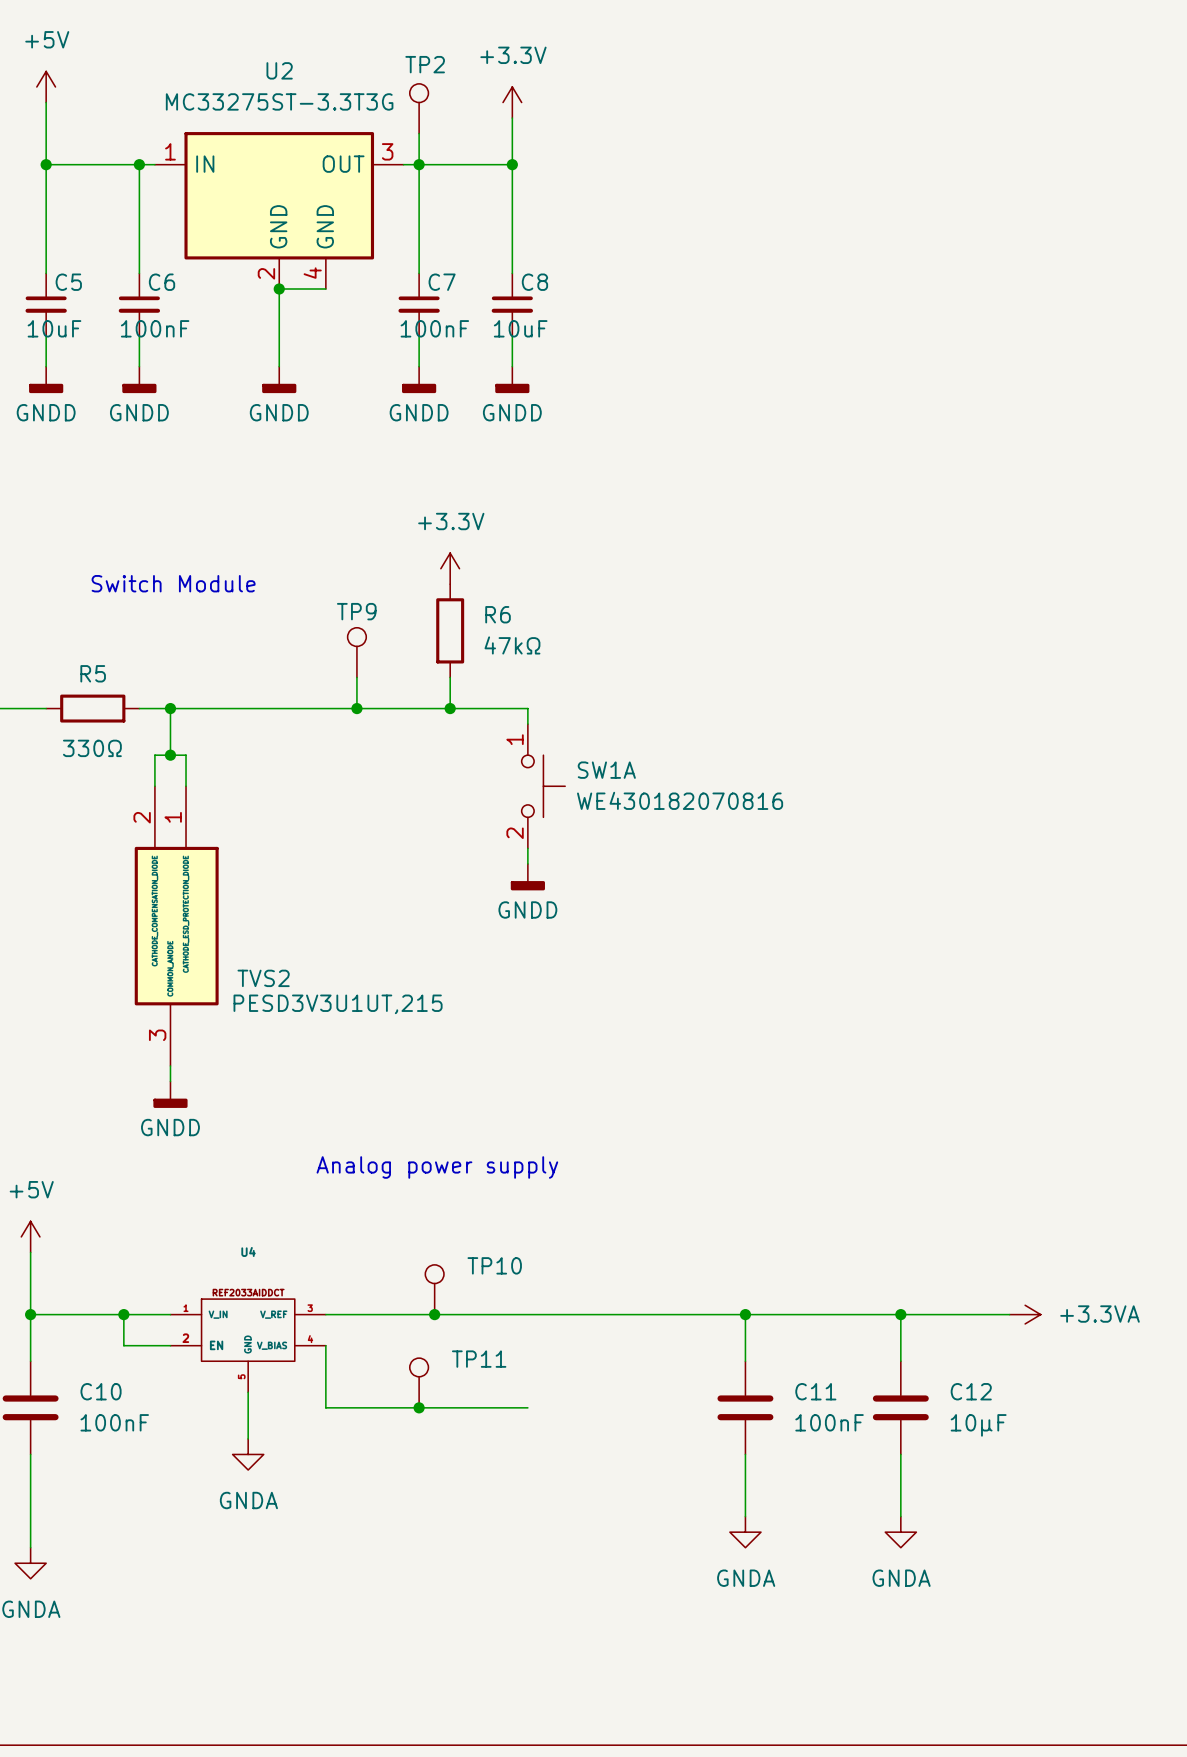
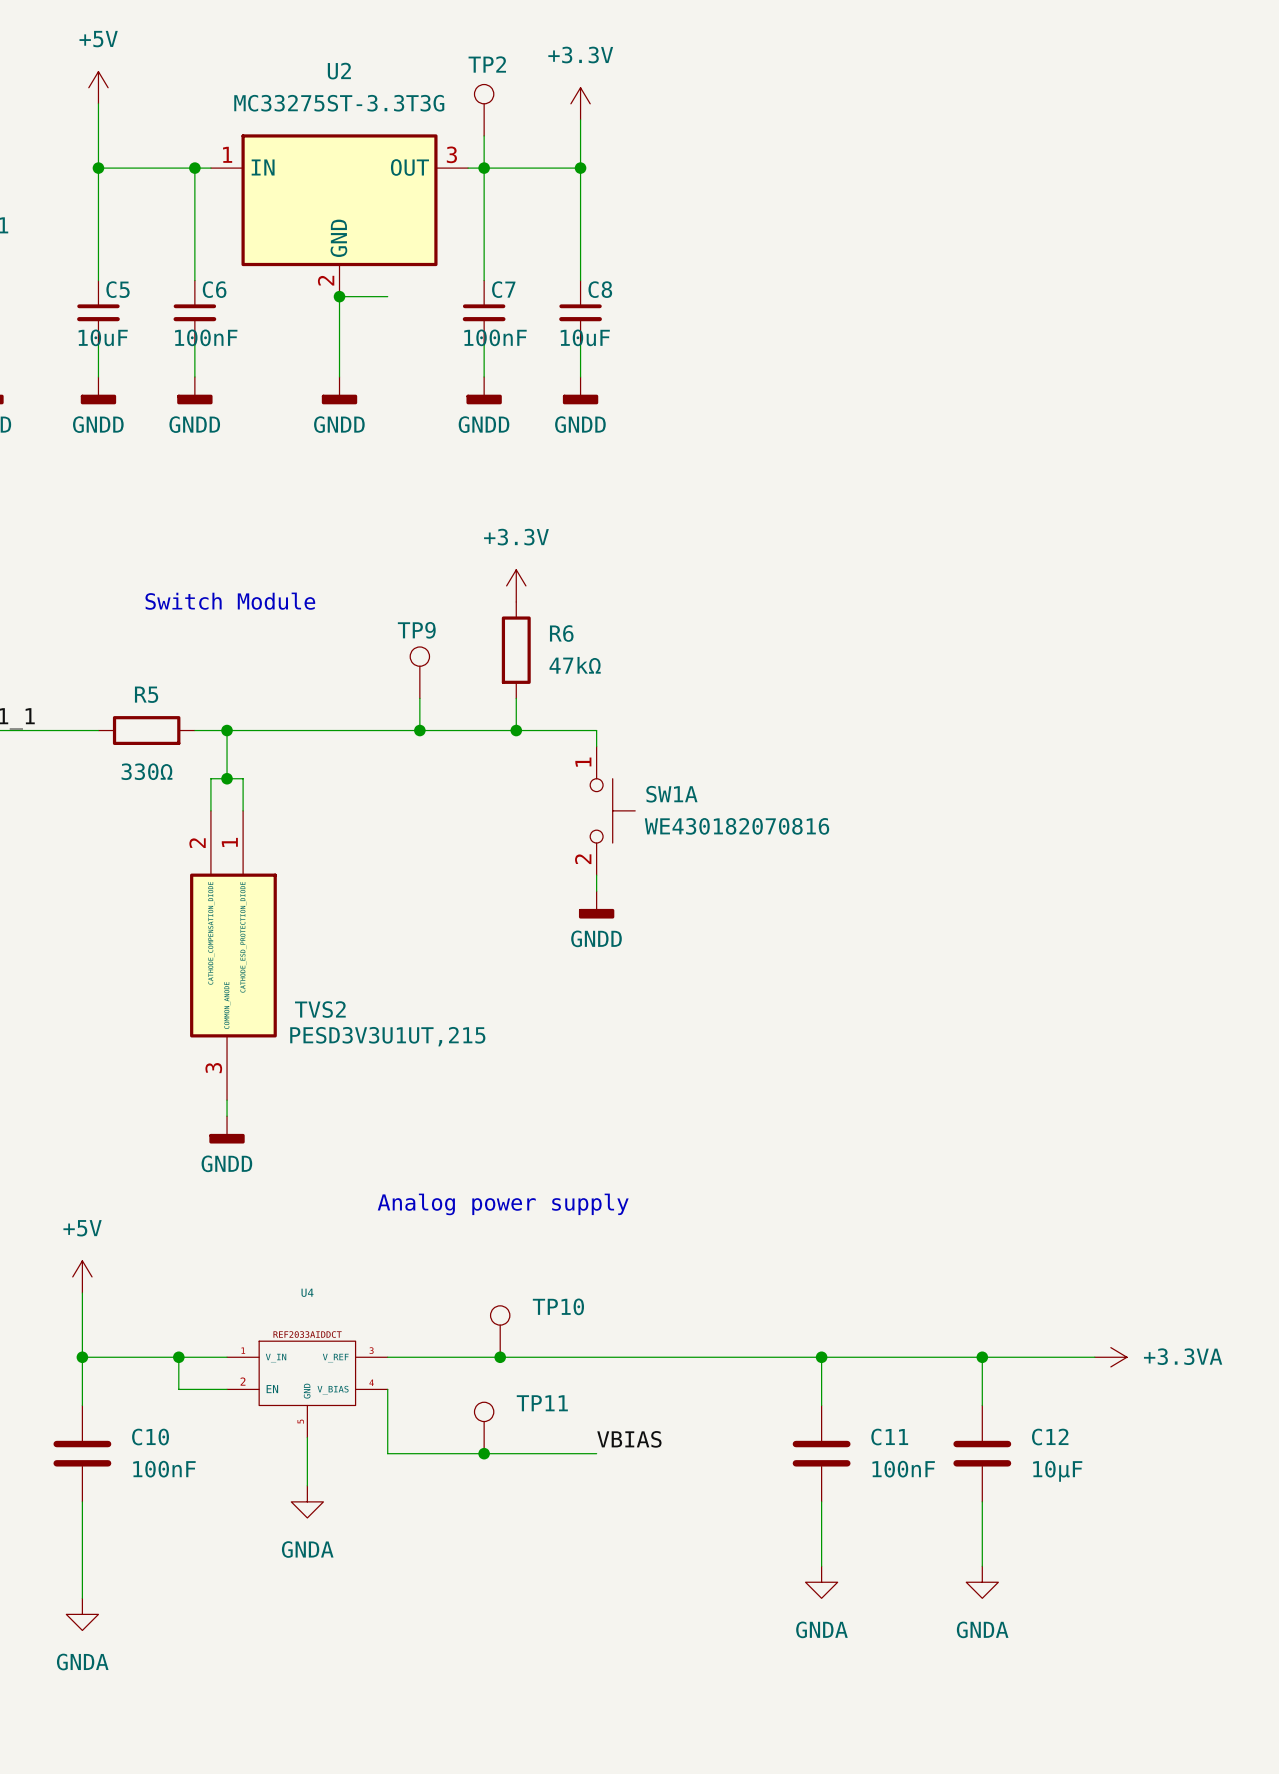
U2 symbol: [154, 132, 404, 289] -> [210, 134, 469, 297]
label: none -> VBIAS (629, 1439)

